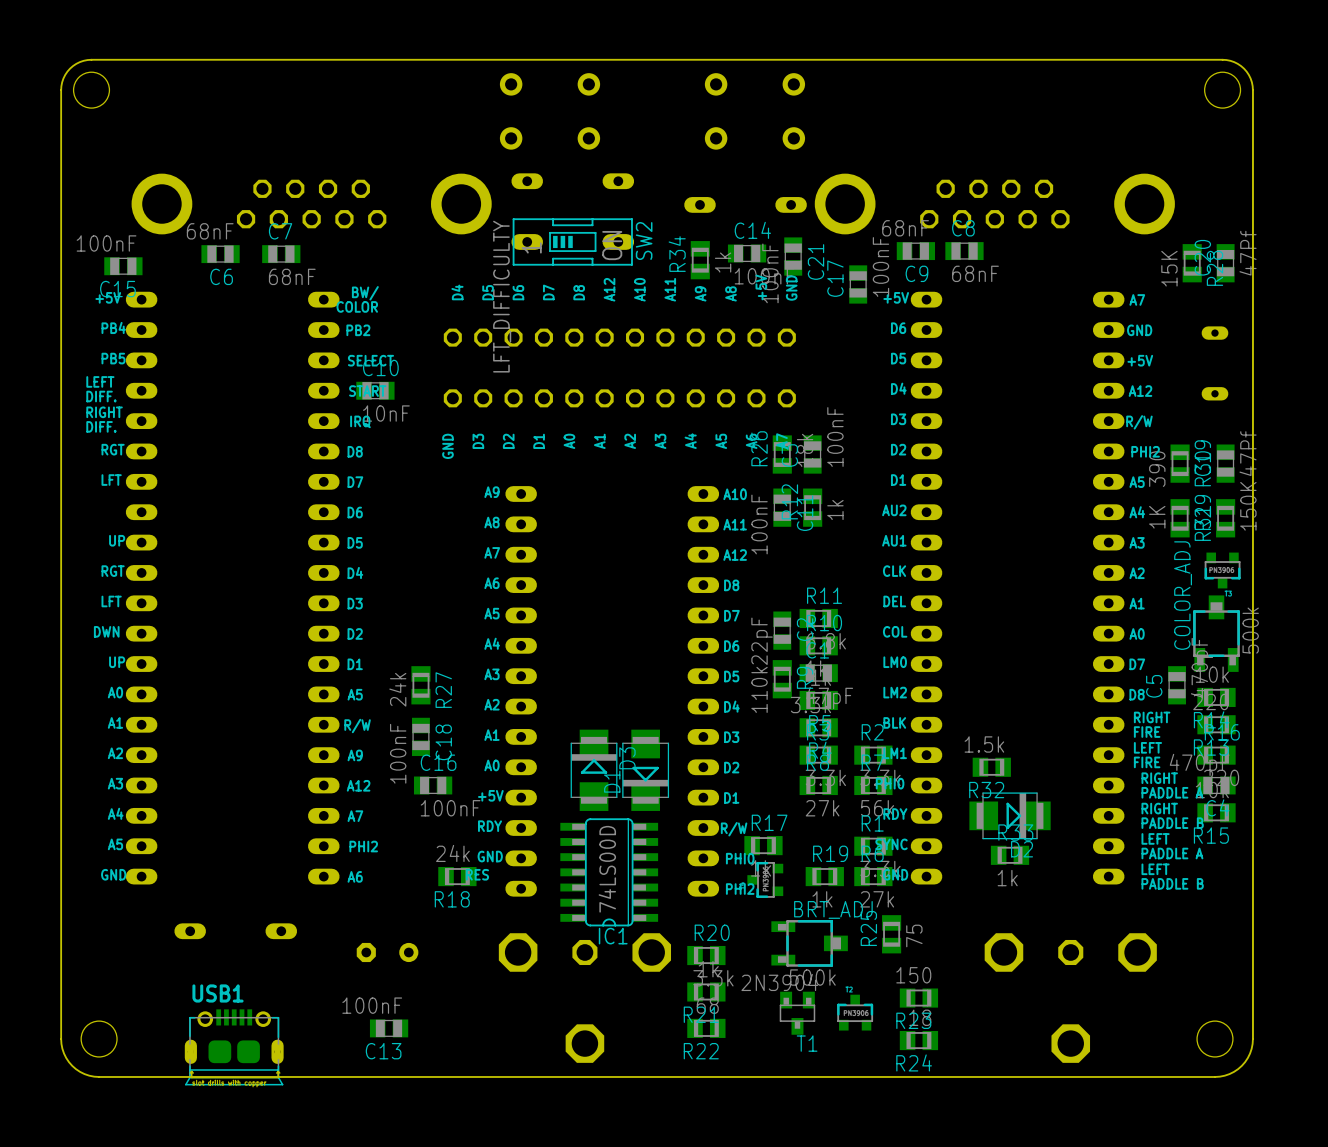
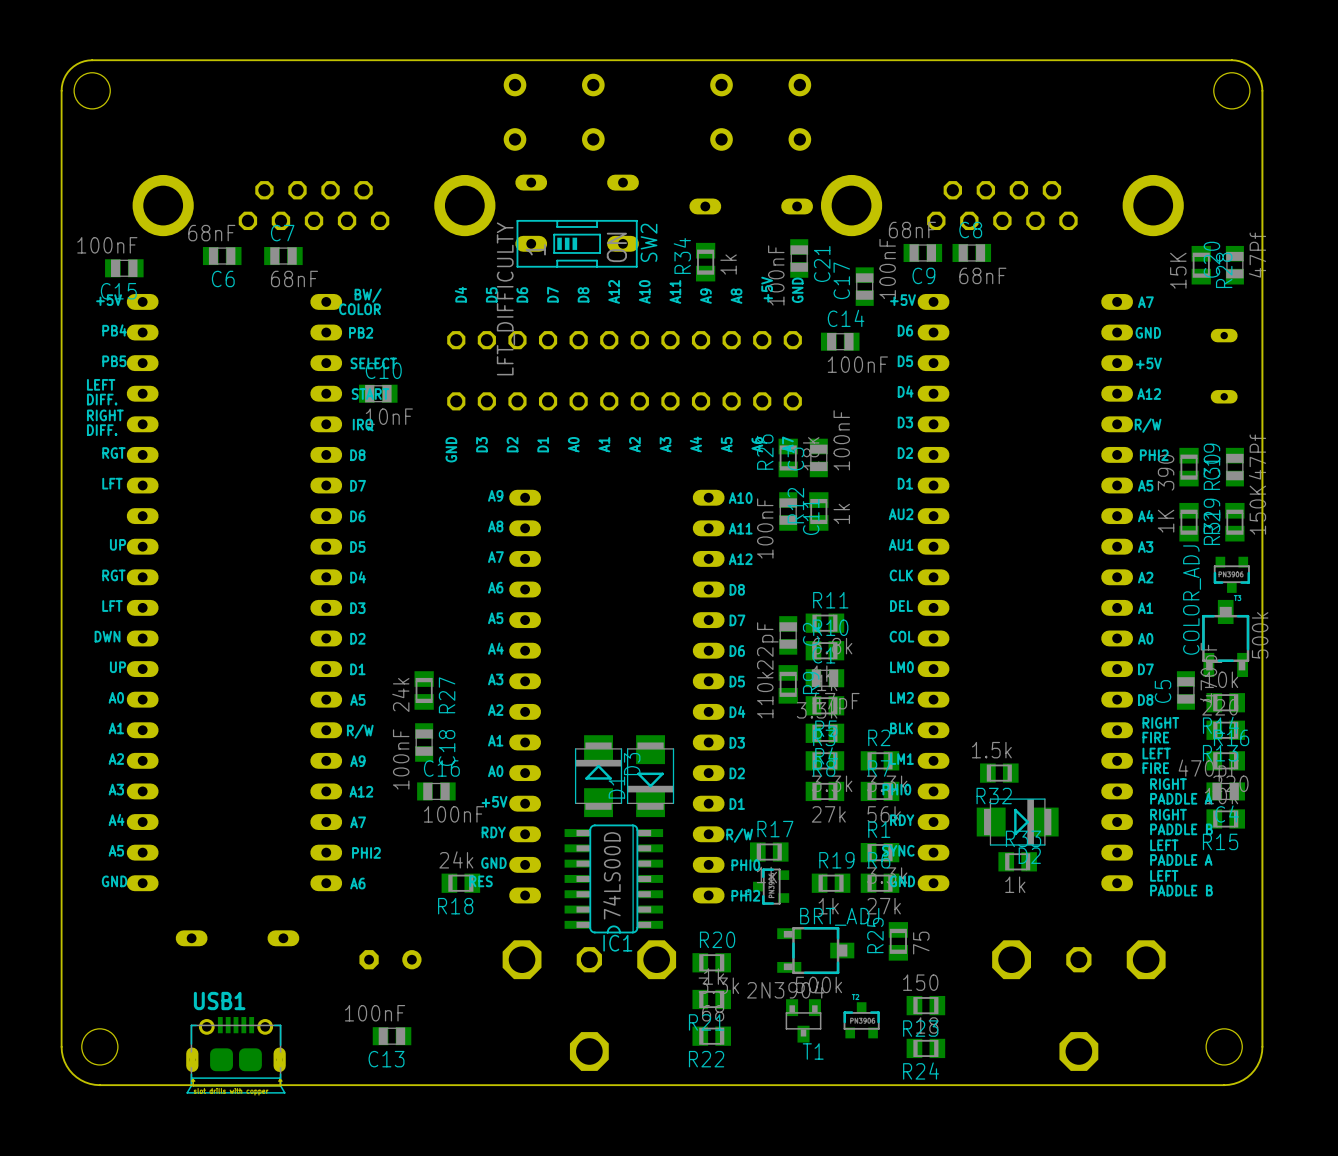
C14 position: (747, 253) -> (840, 341)

